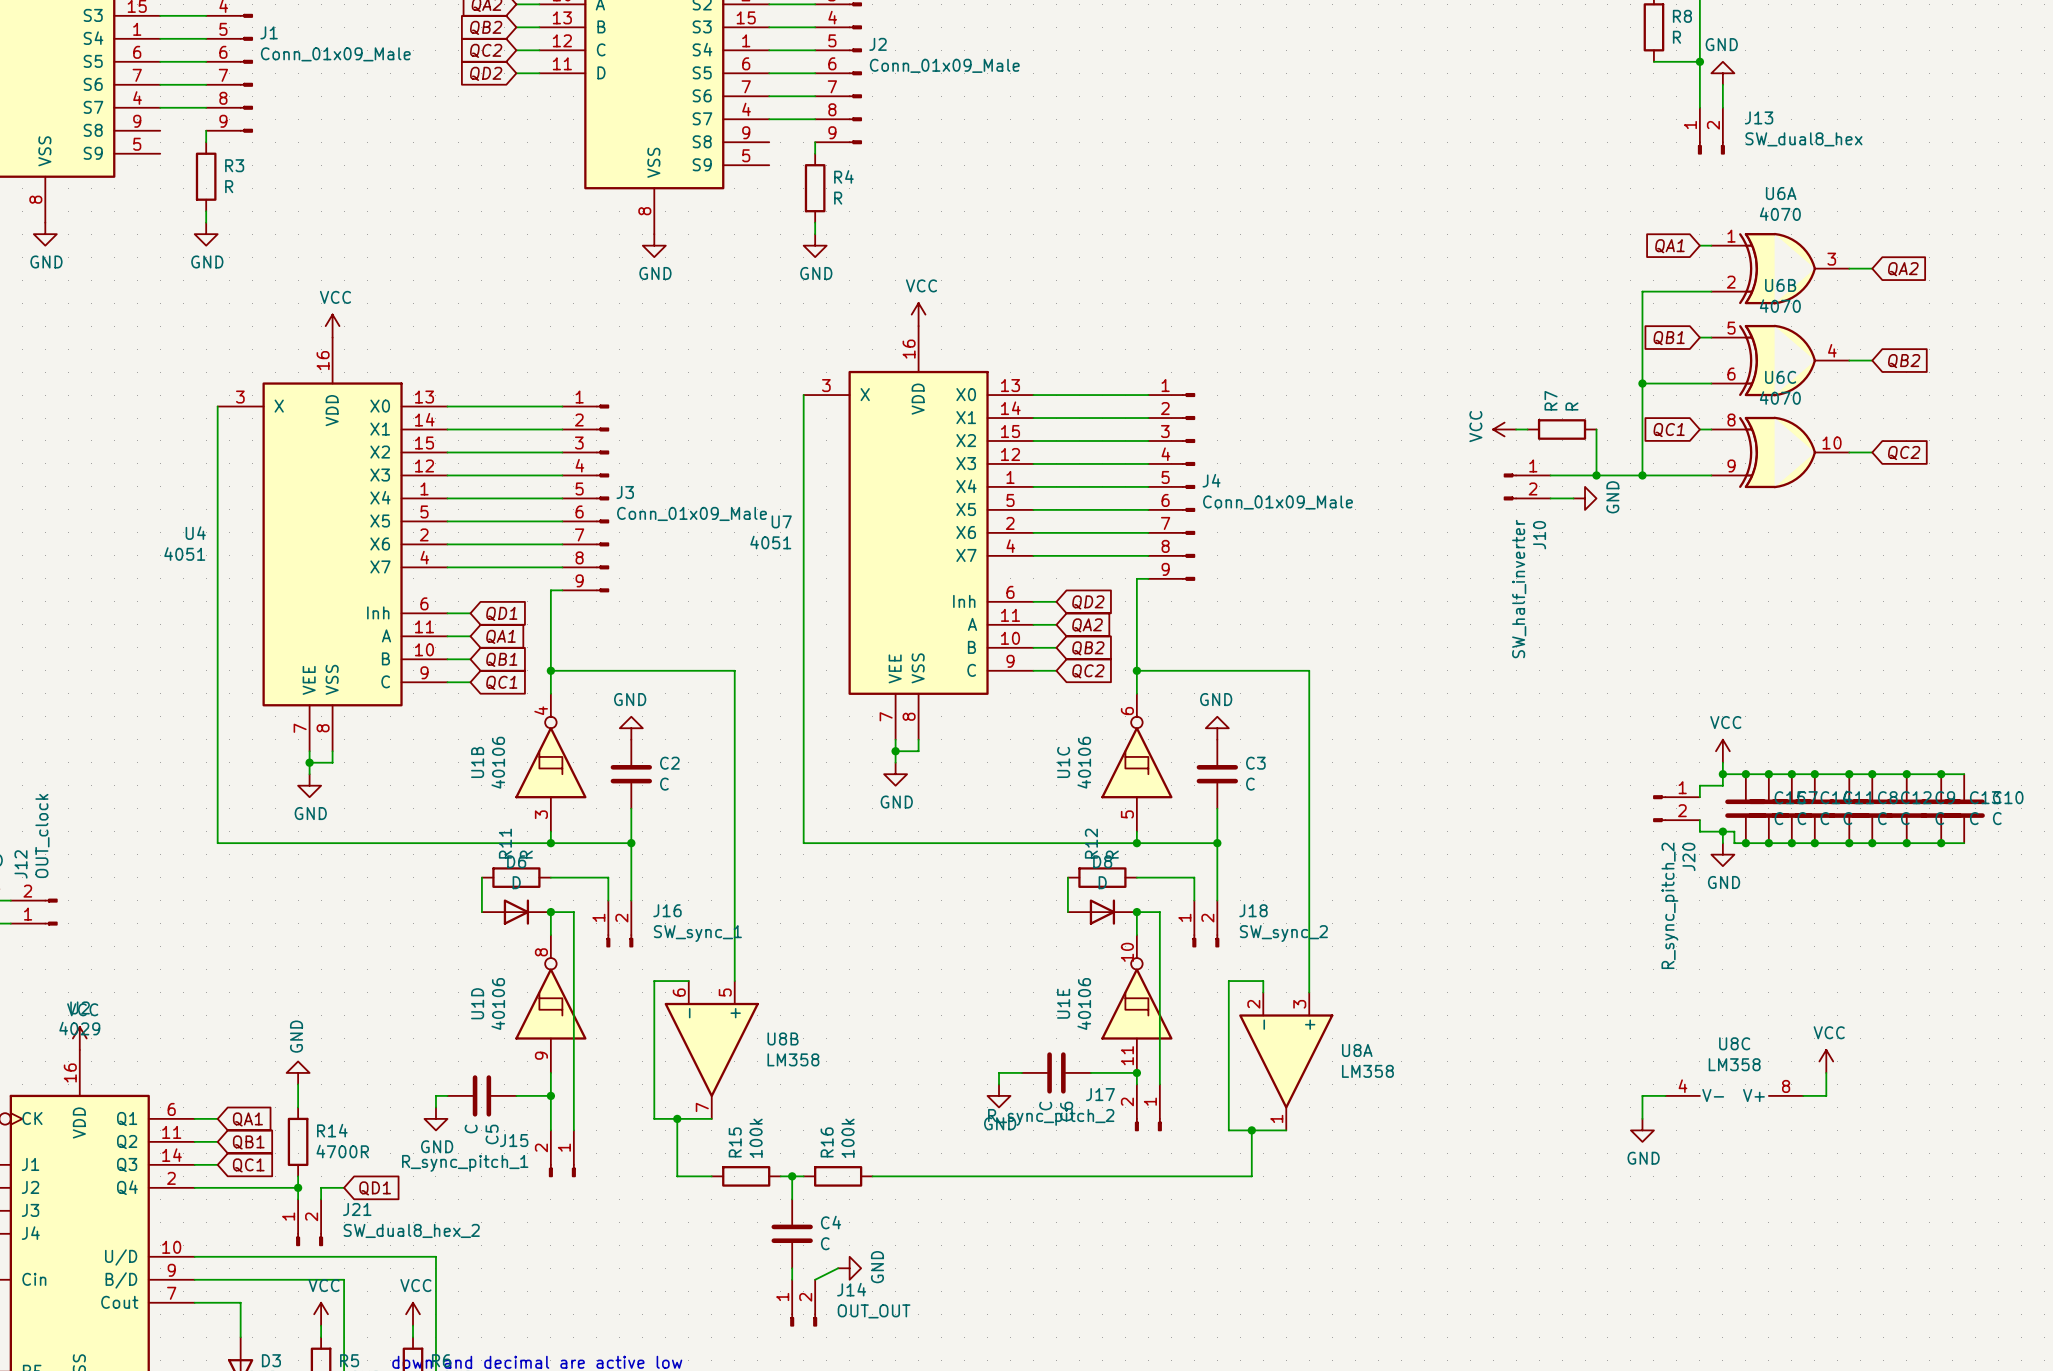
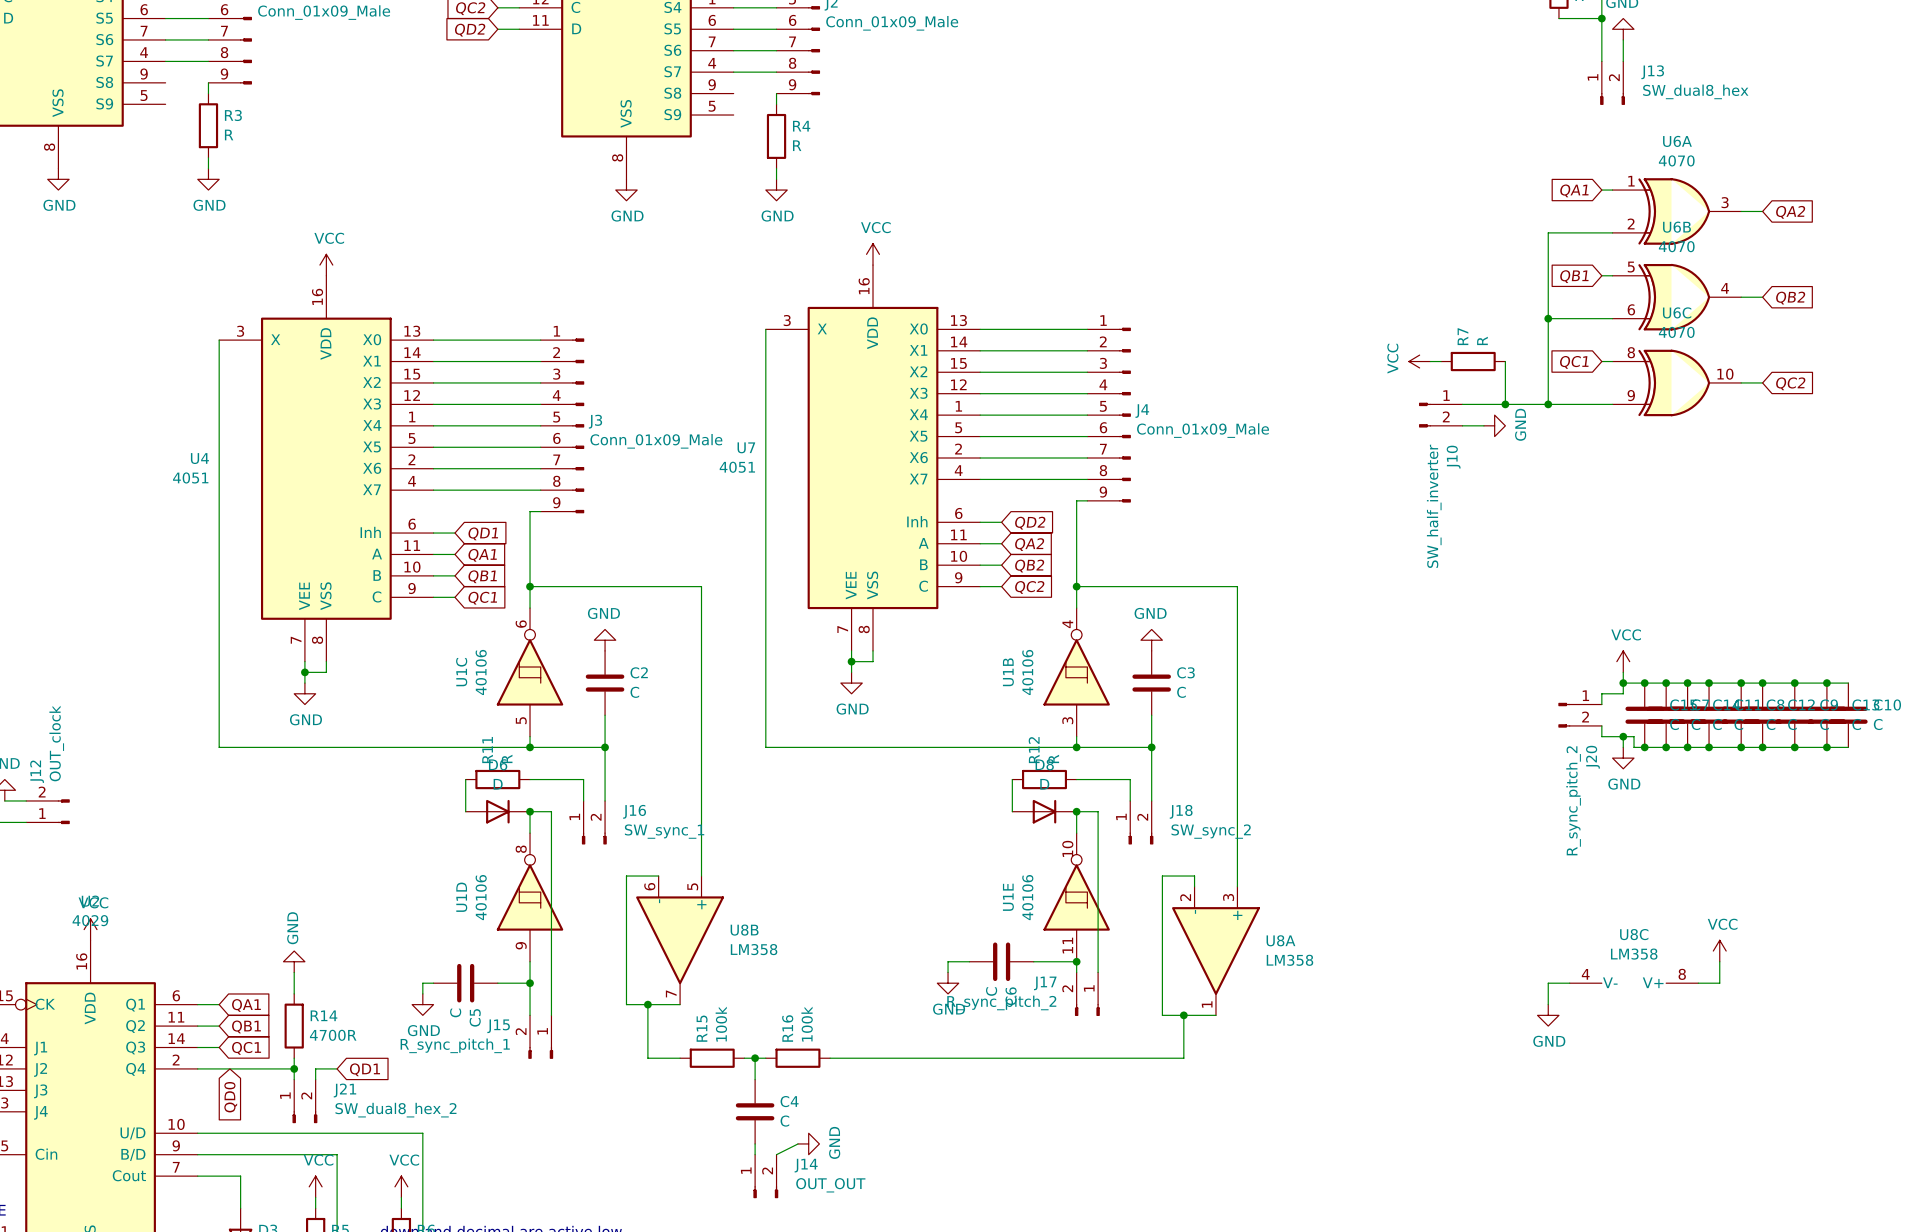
U1B position: (550, 762) -> (1076, 672)
U1C position: (1136, 762) -> (530, 672)
global label: none -> QD0 (230, 1097)

